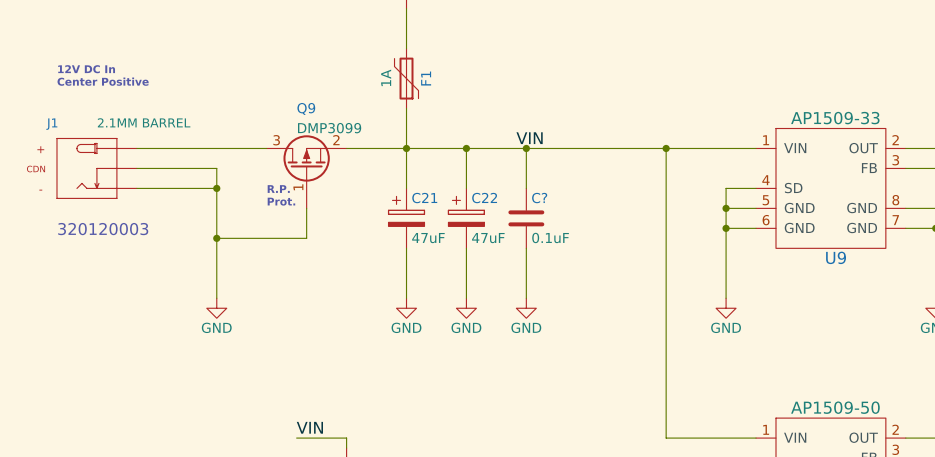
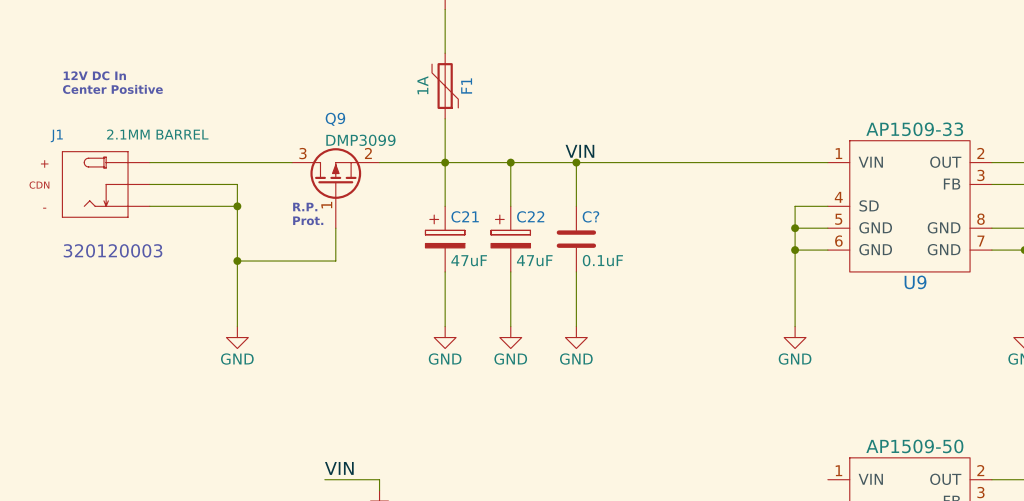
wire: (666, 148) (666, 438) (756, 438) -> none
junction: (666, 148) -> none

